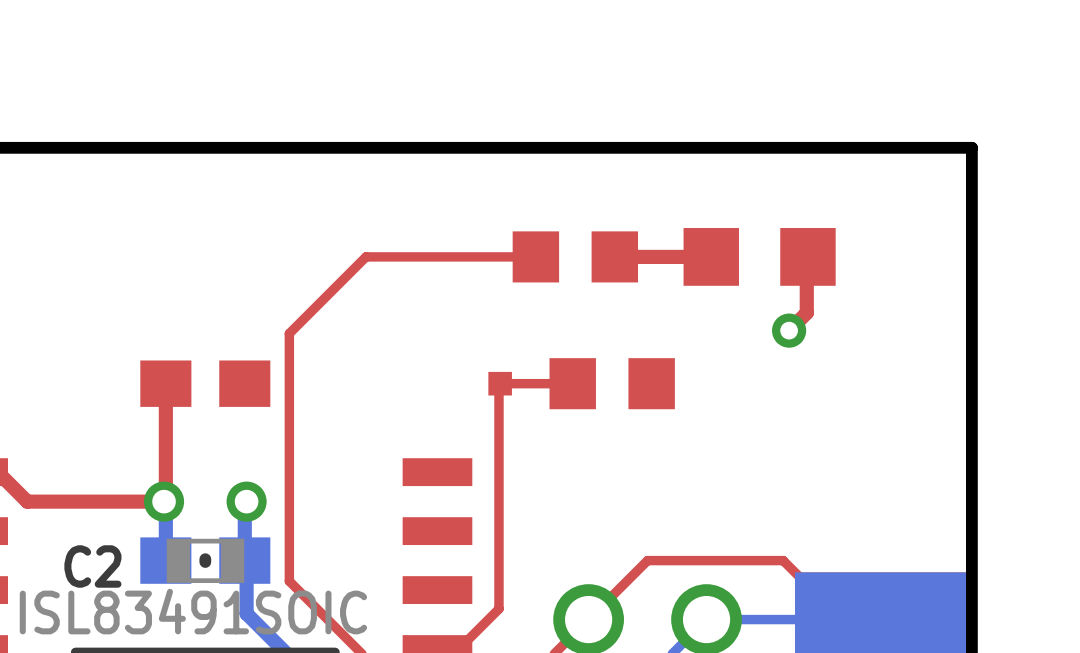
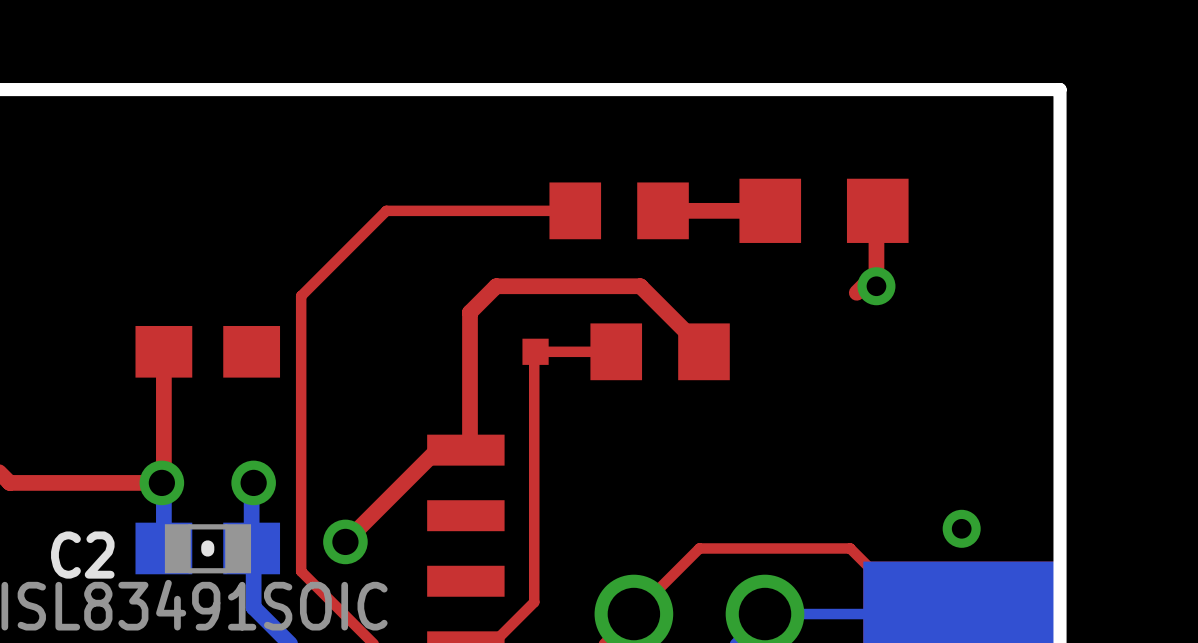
via position: (789, 330) -> (876, 286)
top track: none -> (703, 349) (640, 286) (496, 286) (469, 312) (469, 446) (465, 450) (437, 450) (345, 541)
via: none -> (961, 528)
via: none -> (345, 541)

